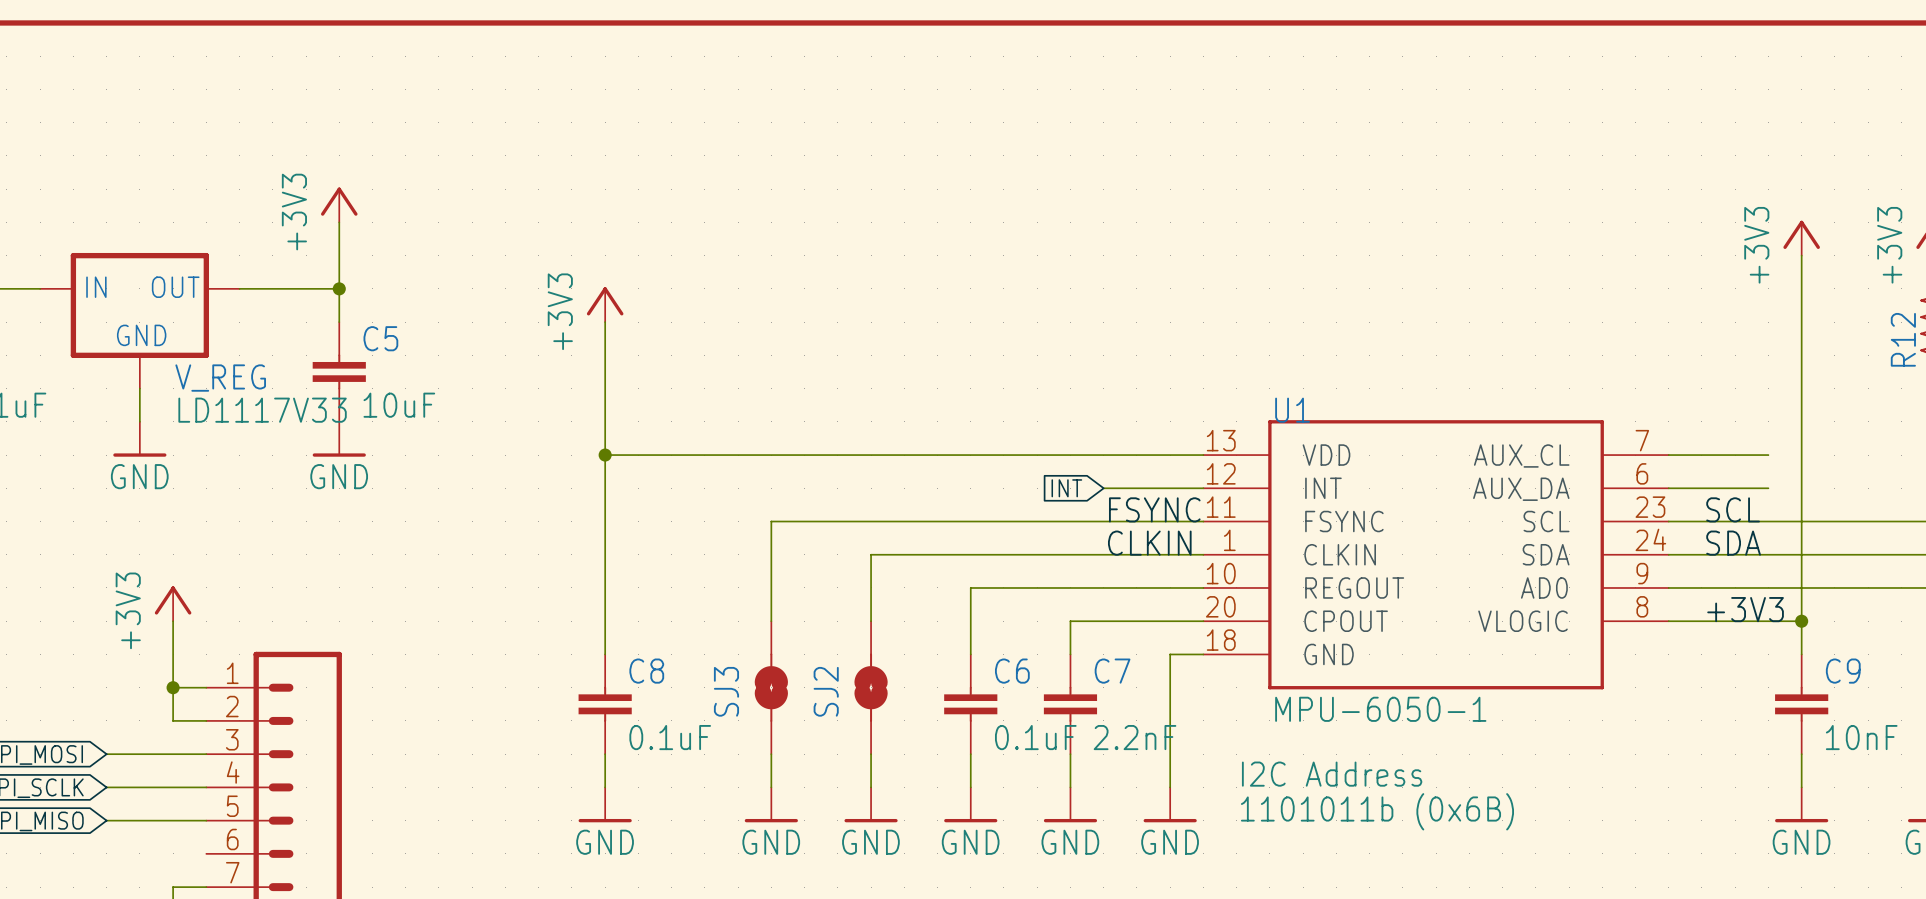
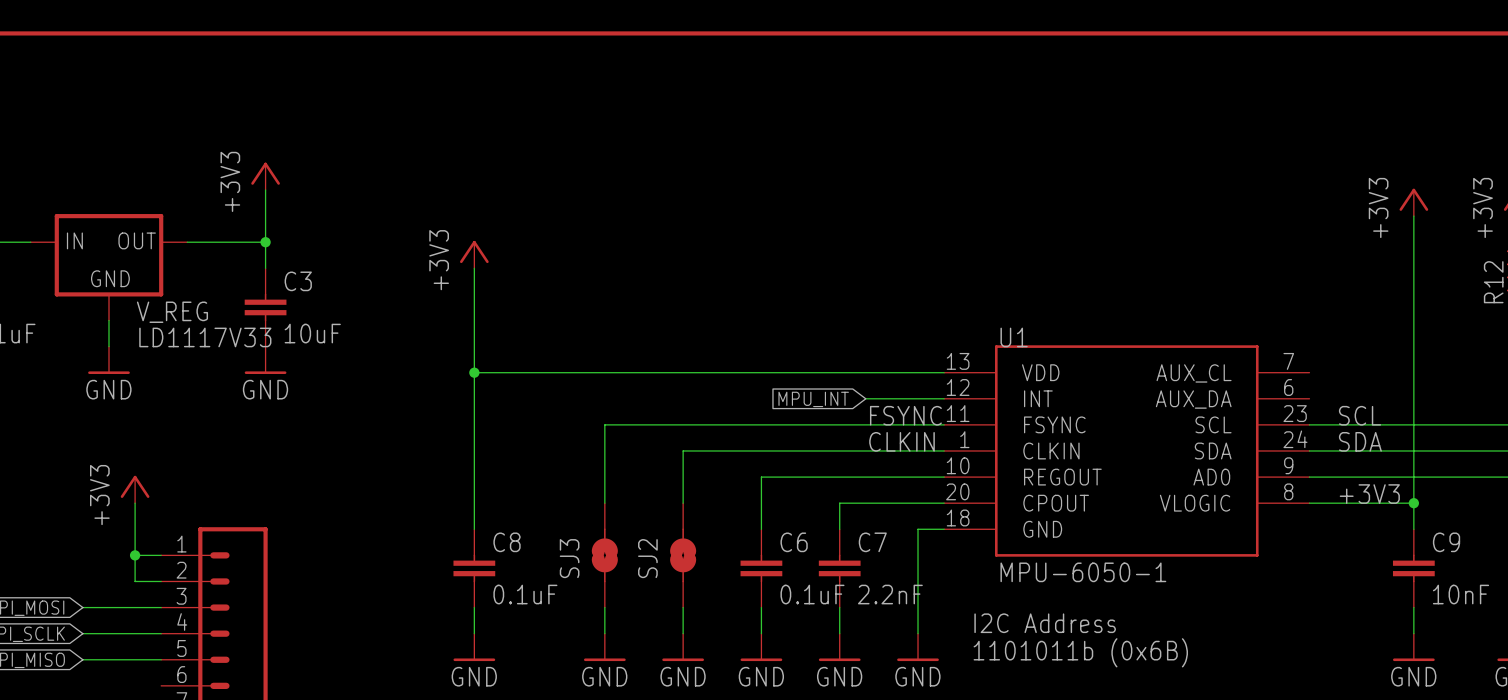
C5 name: C5 (380, 338) -> C3 (298, 281)
wire: (1668, 455) (1768, 455) -> none
global label: INT (1066, 488) -> MPU_INT (813, 399)
wire: (1668, 488) (1768, 488) -> none

